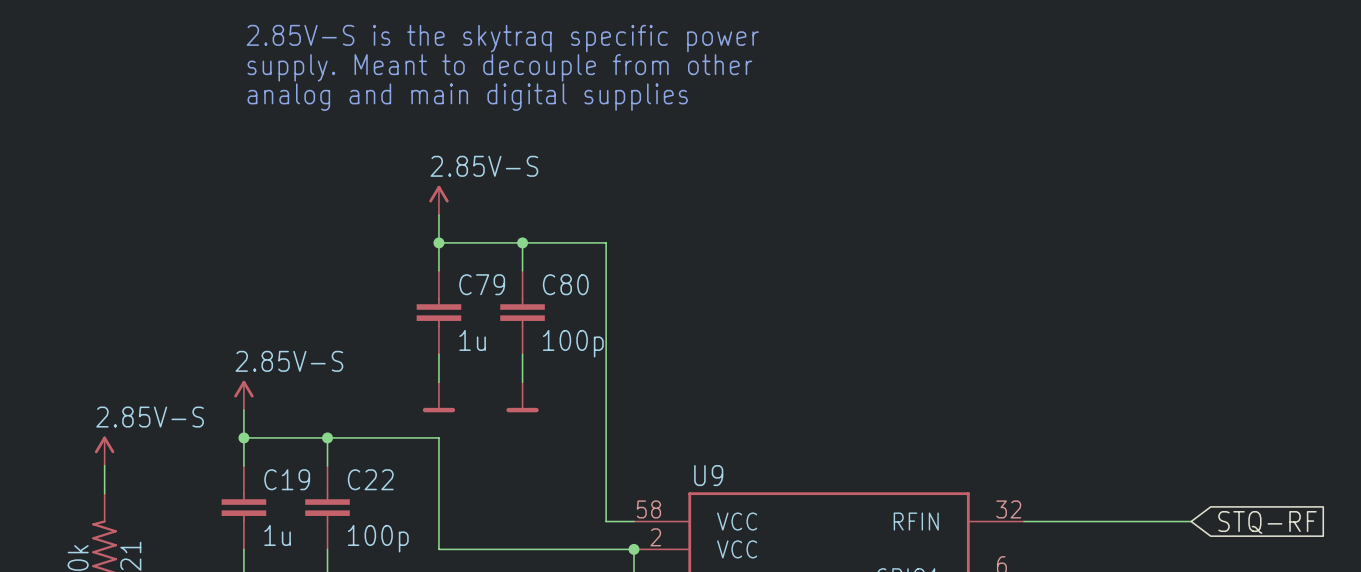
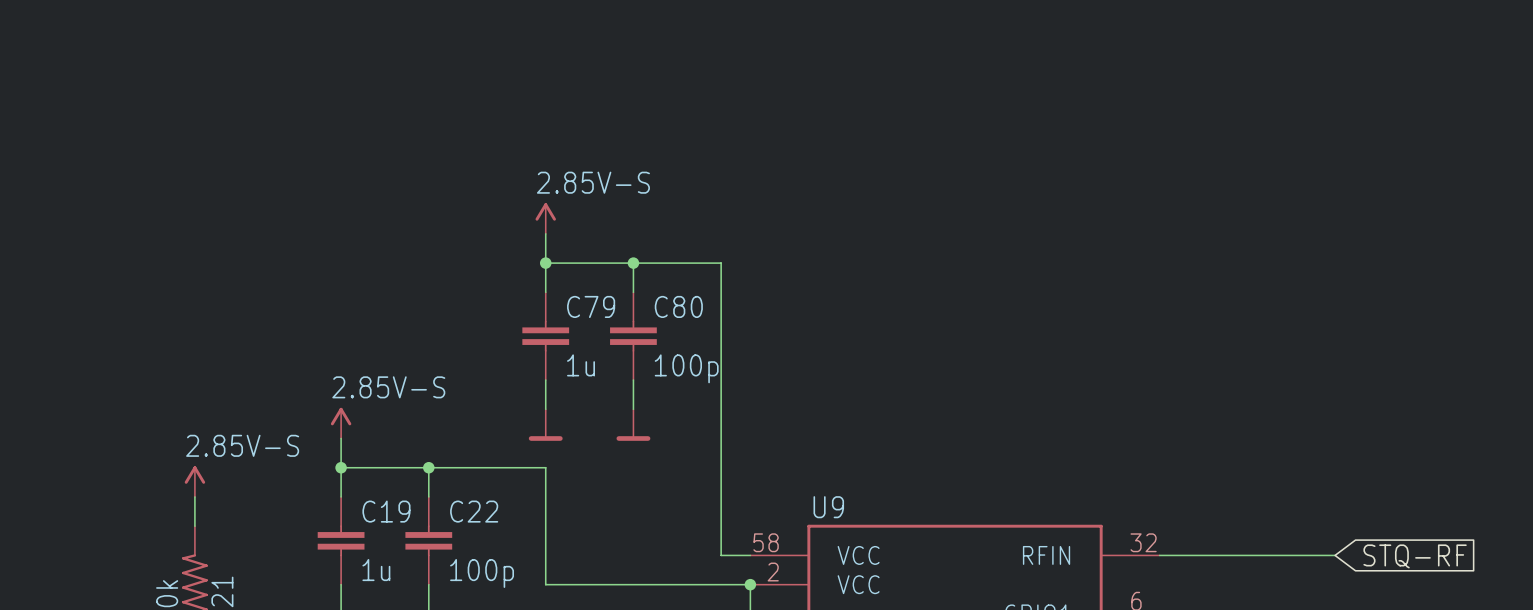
text: 2.85V-S is the skytraq specific power (502, 38) -> none
text: supply. Meant to decouple from other (499, 67) -> none
text: analog and main digital supplies (467, 97) -> none

